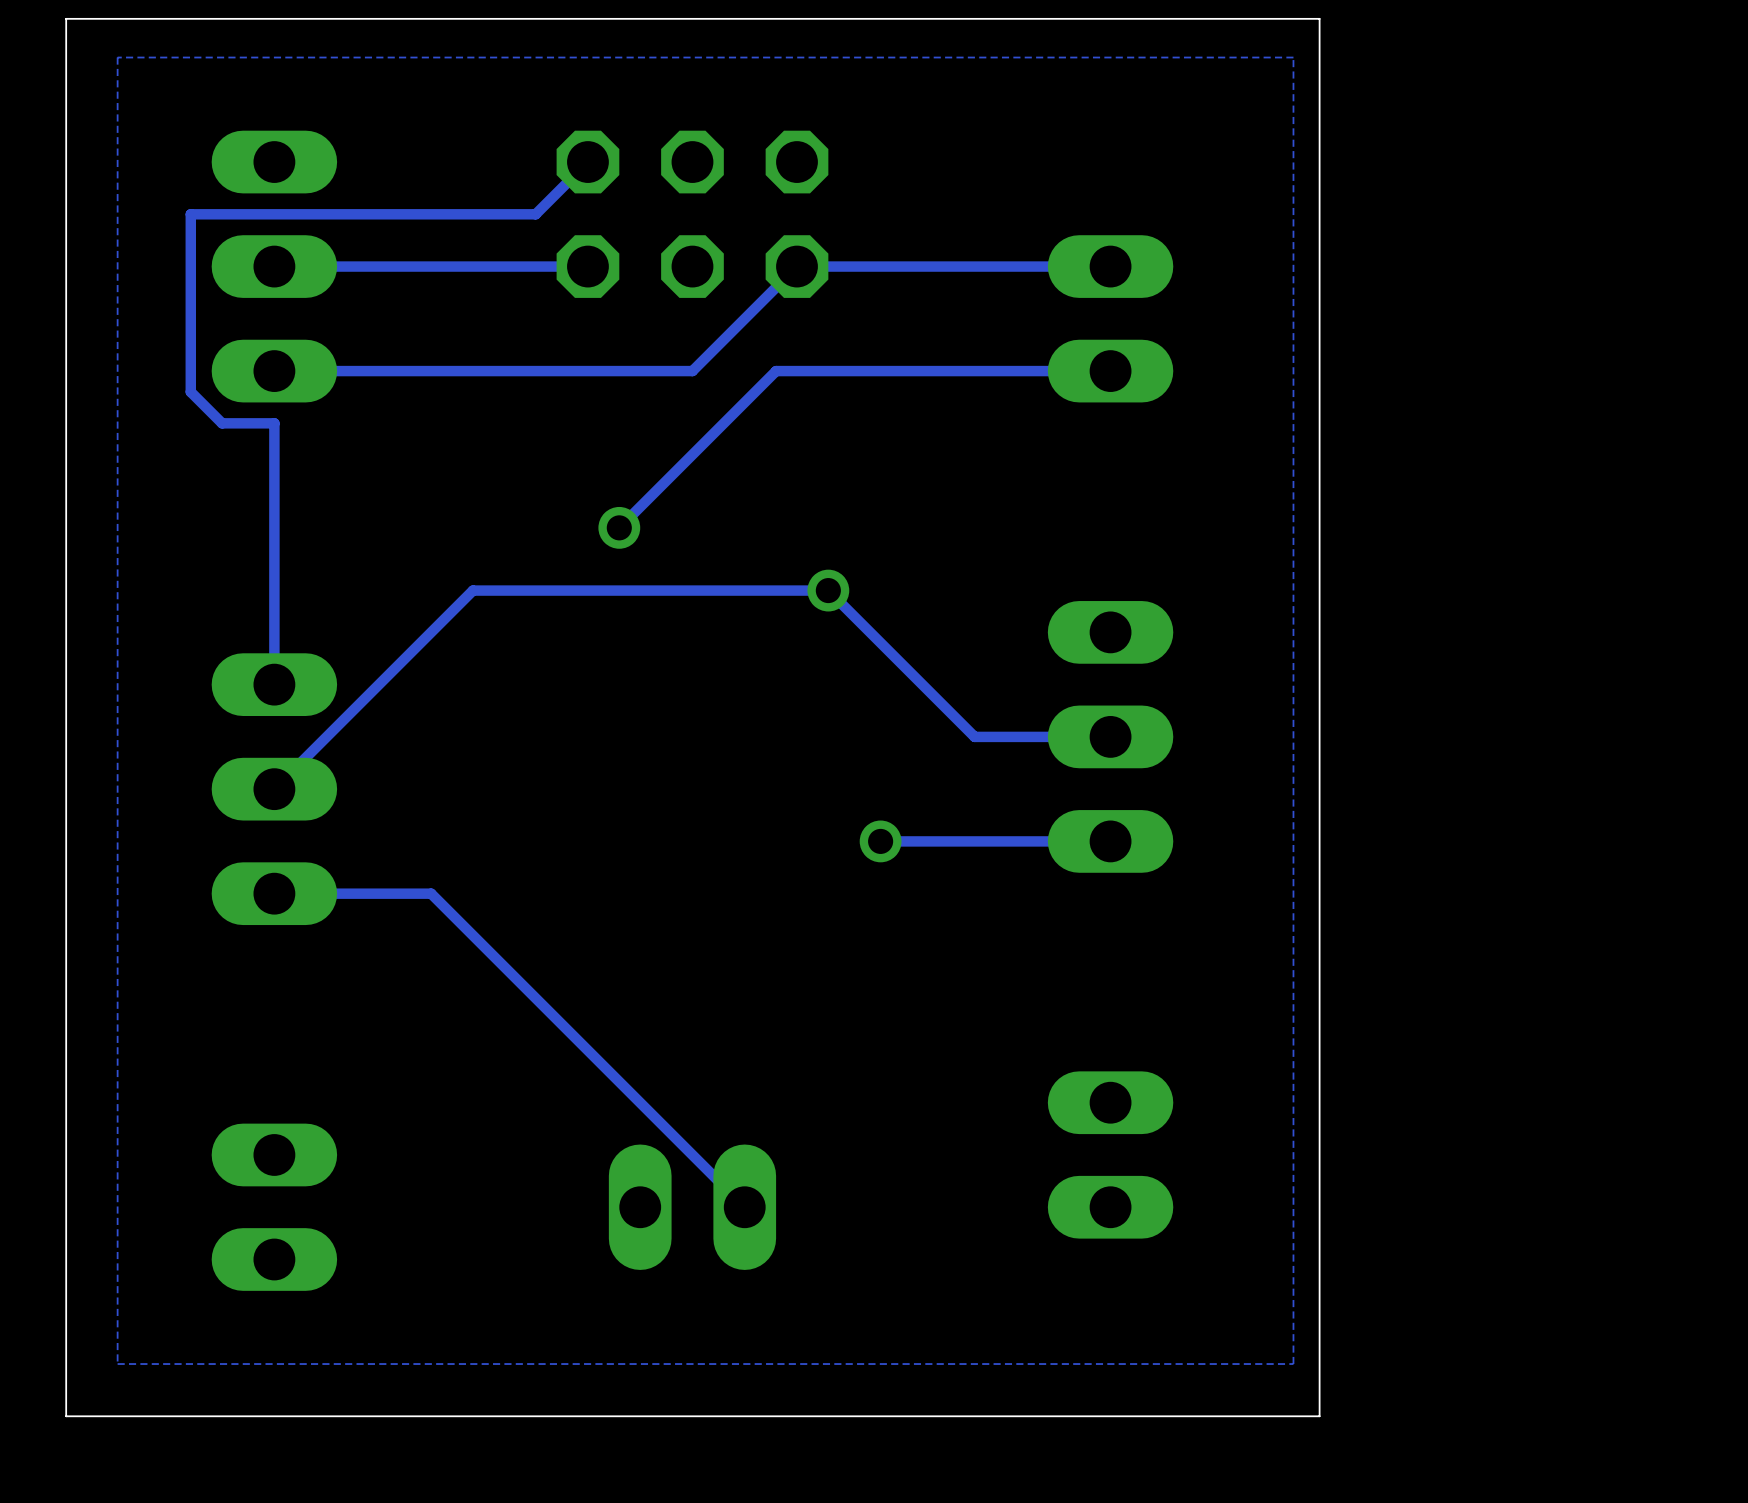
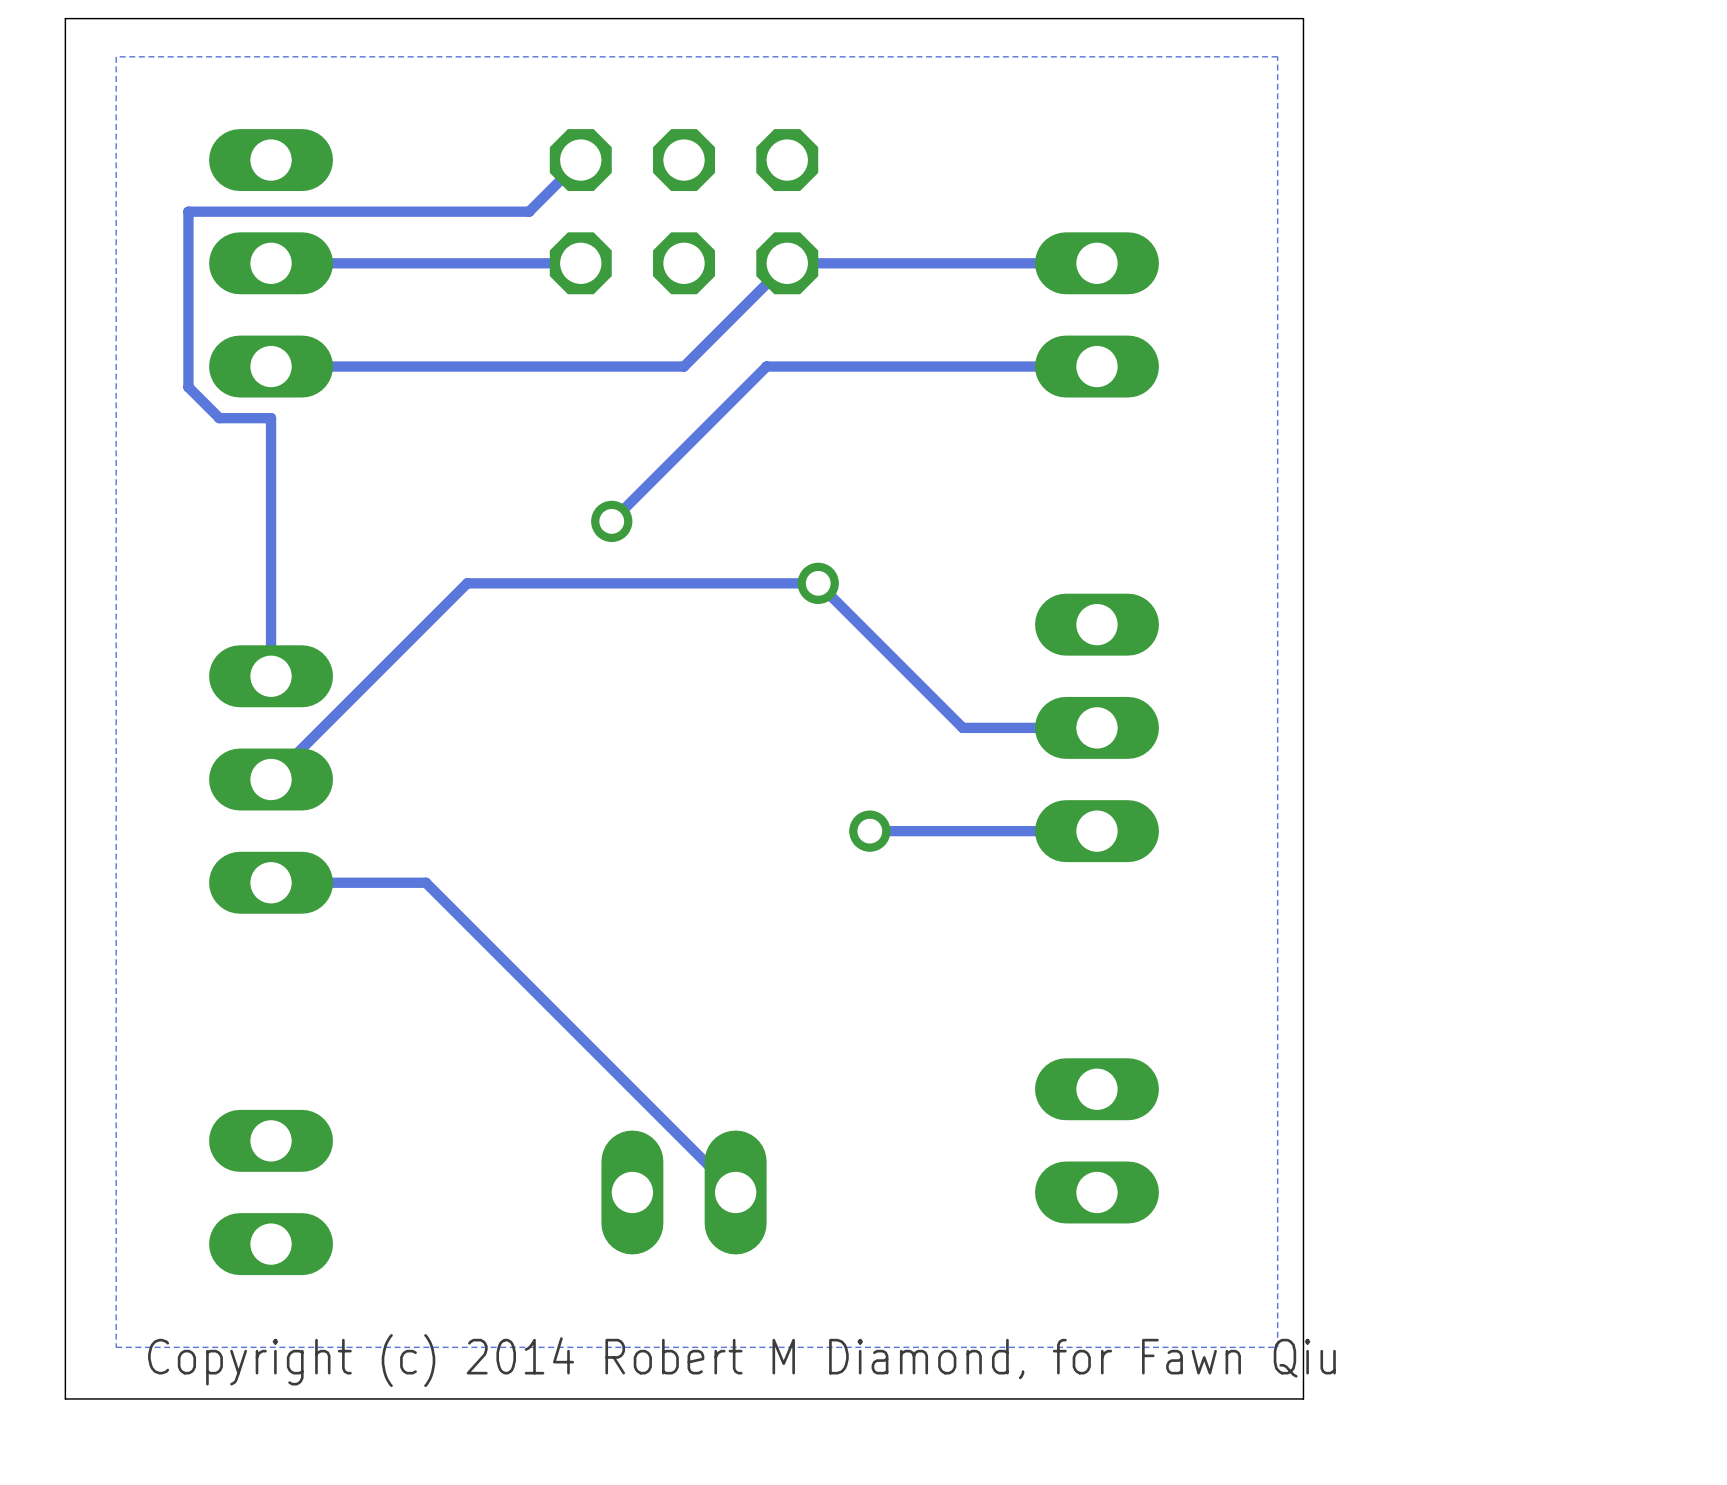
text: none -> Copyright (c) 2014 Robert M Diamond, for Fawn Qiu (741, 1360)

